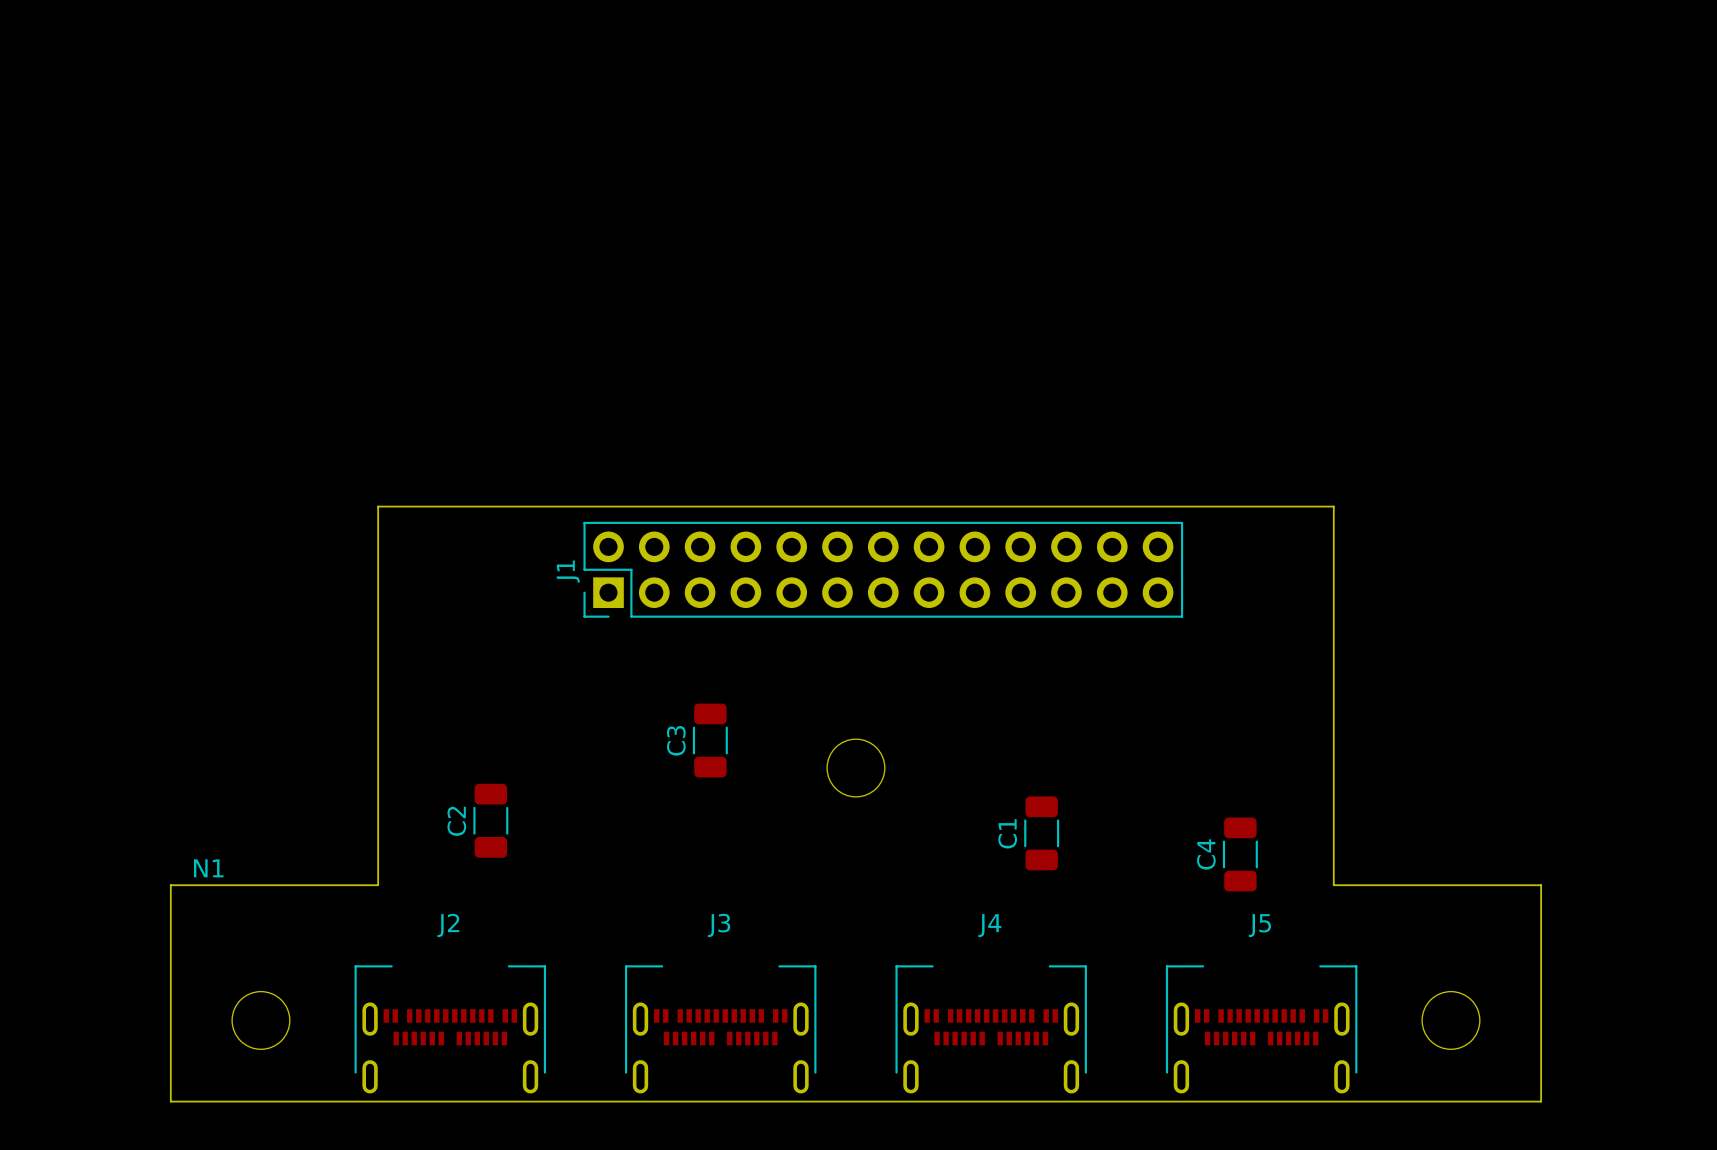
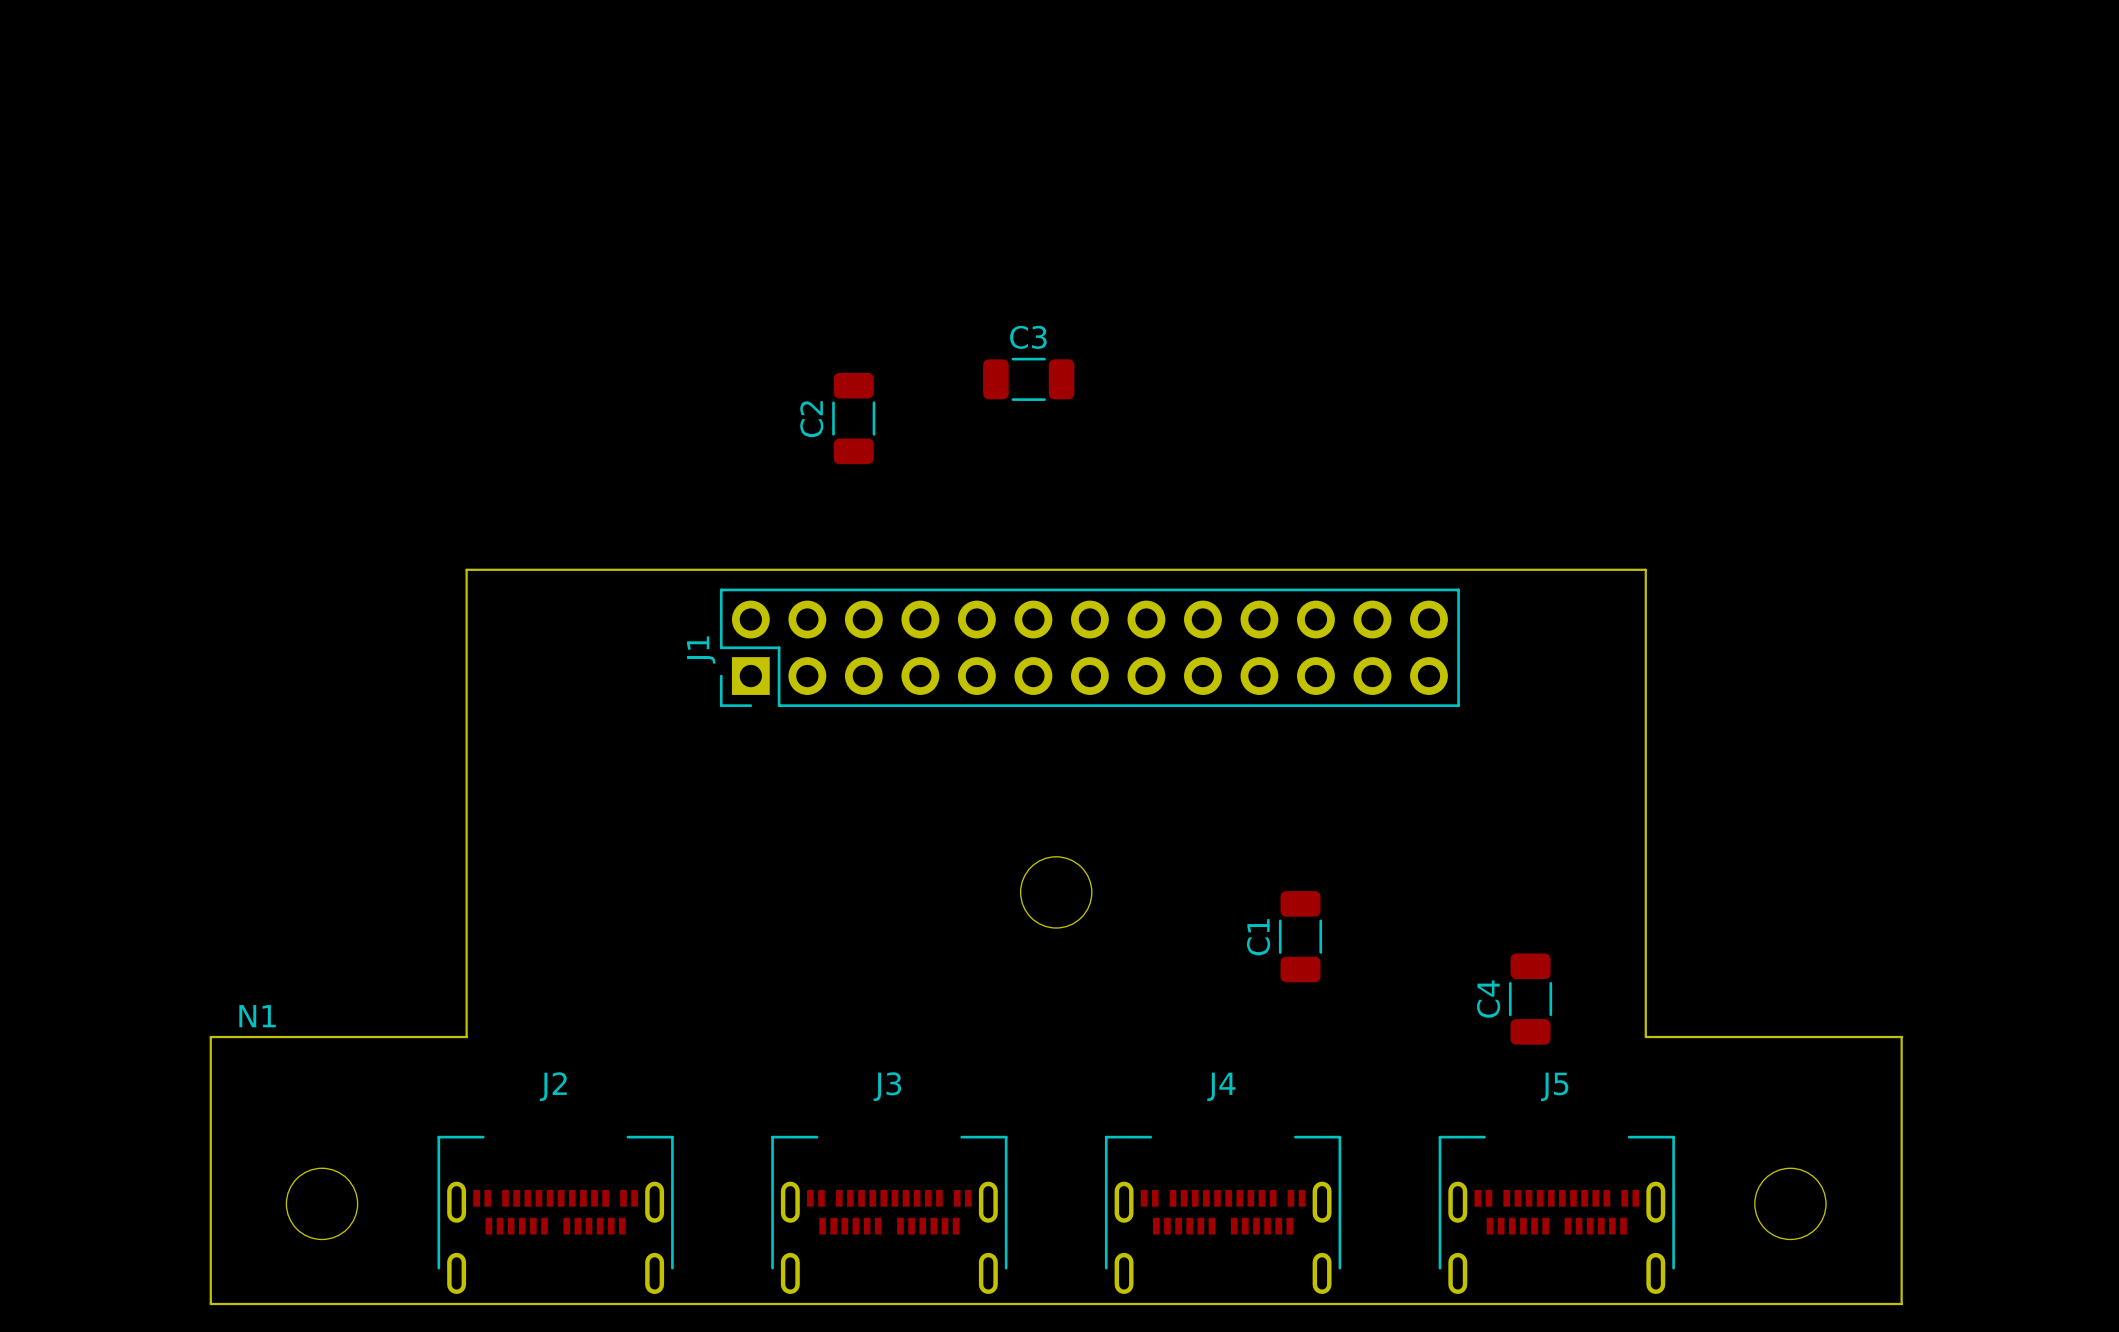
C3 rotation: 0° (710, 740) -> 90° clockwise (1028, 379)
C3 position: (710, 740) -> (1028, 379)
C2 position: (490, 820) -> (853, 418)
C1 position: (1041, 833) -> (1300, 936)

